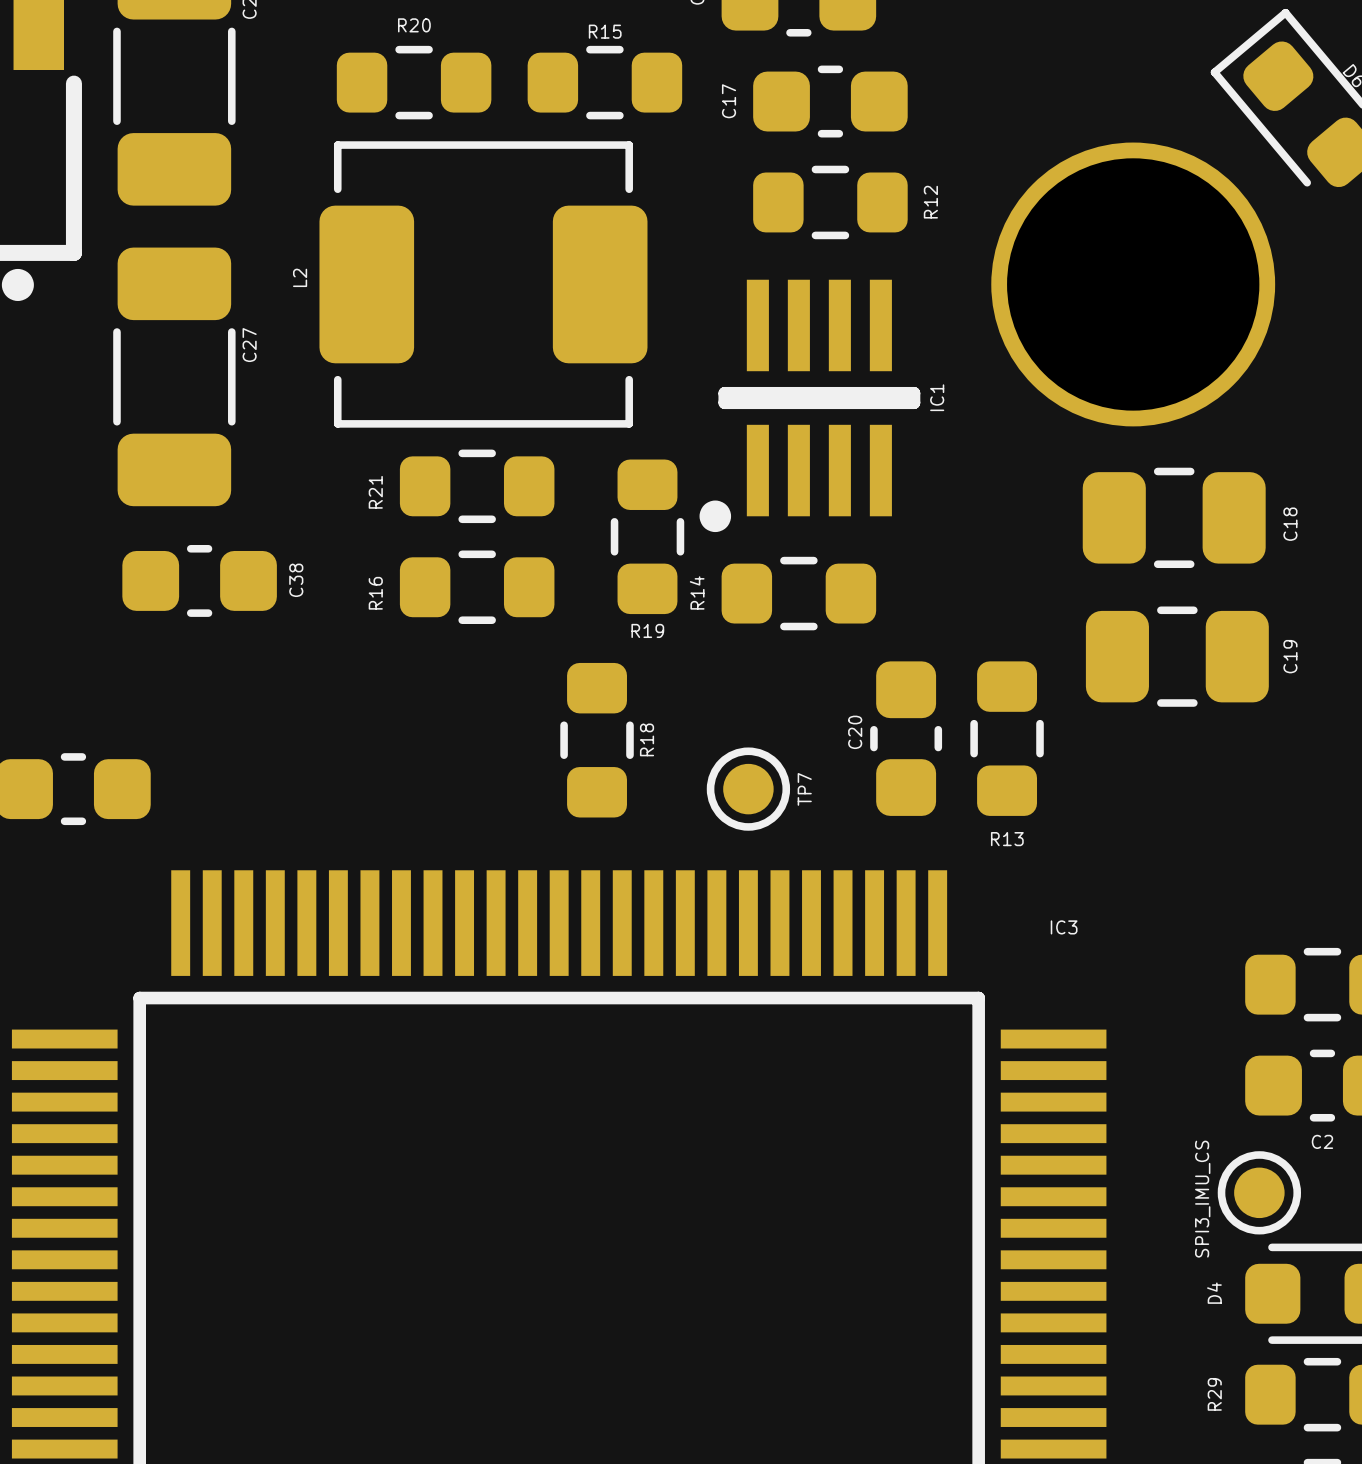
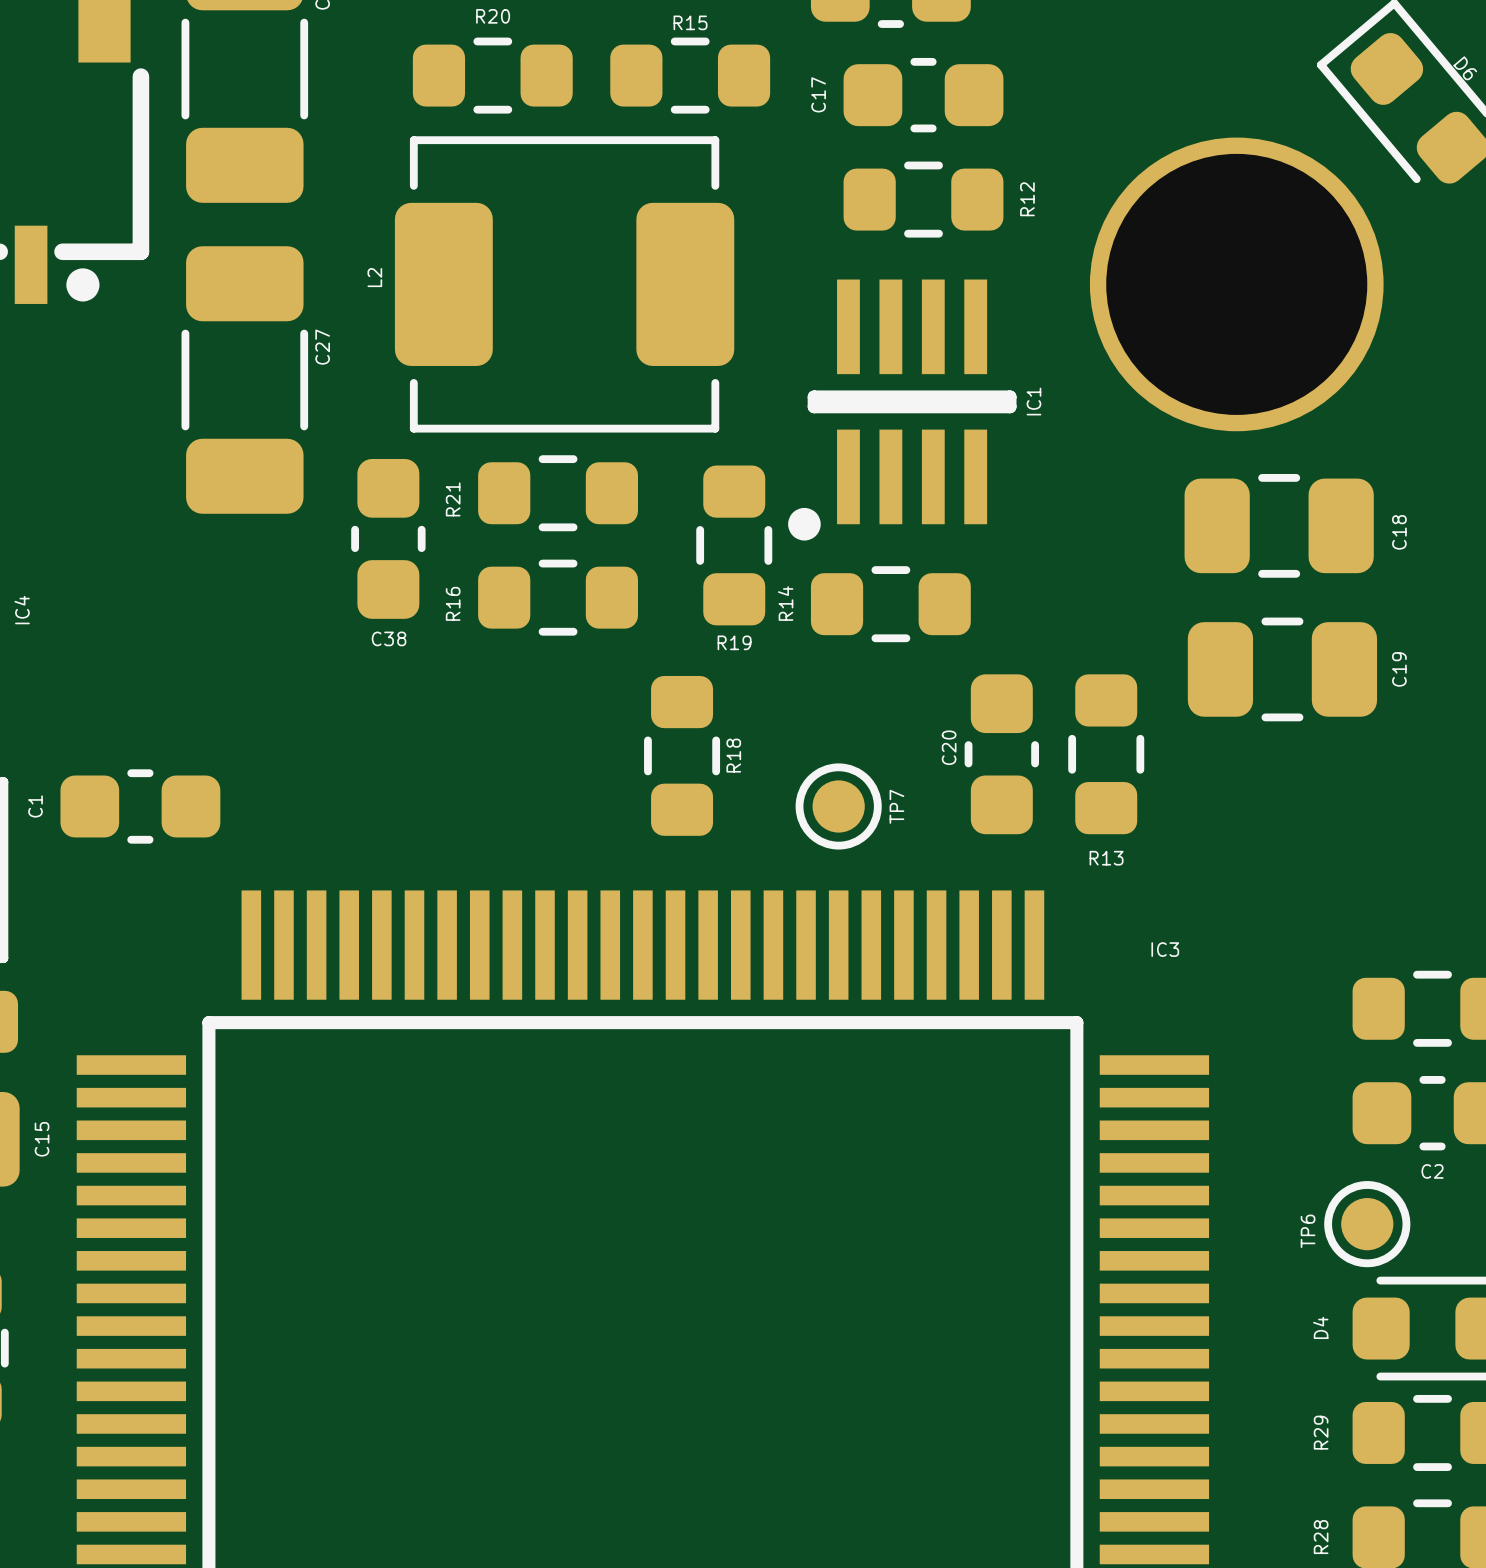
C38 rotation: 0° (199, 580) -> 90° clockwise (388, 538)
C38 position: (199, 580) -> (388, 538)
SPI3_IMU_CS name: SPI3_IMU_CS (1202, 1199) -> TP6 (1308, 1231)

